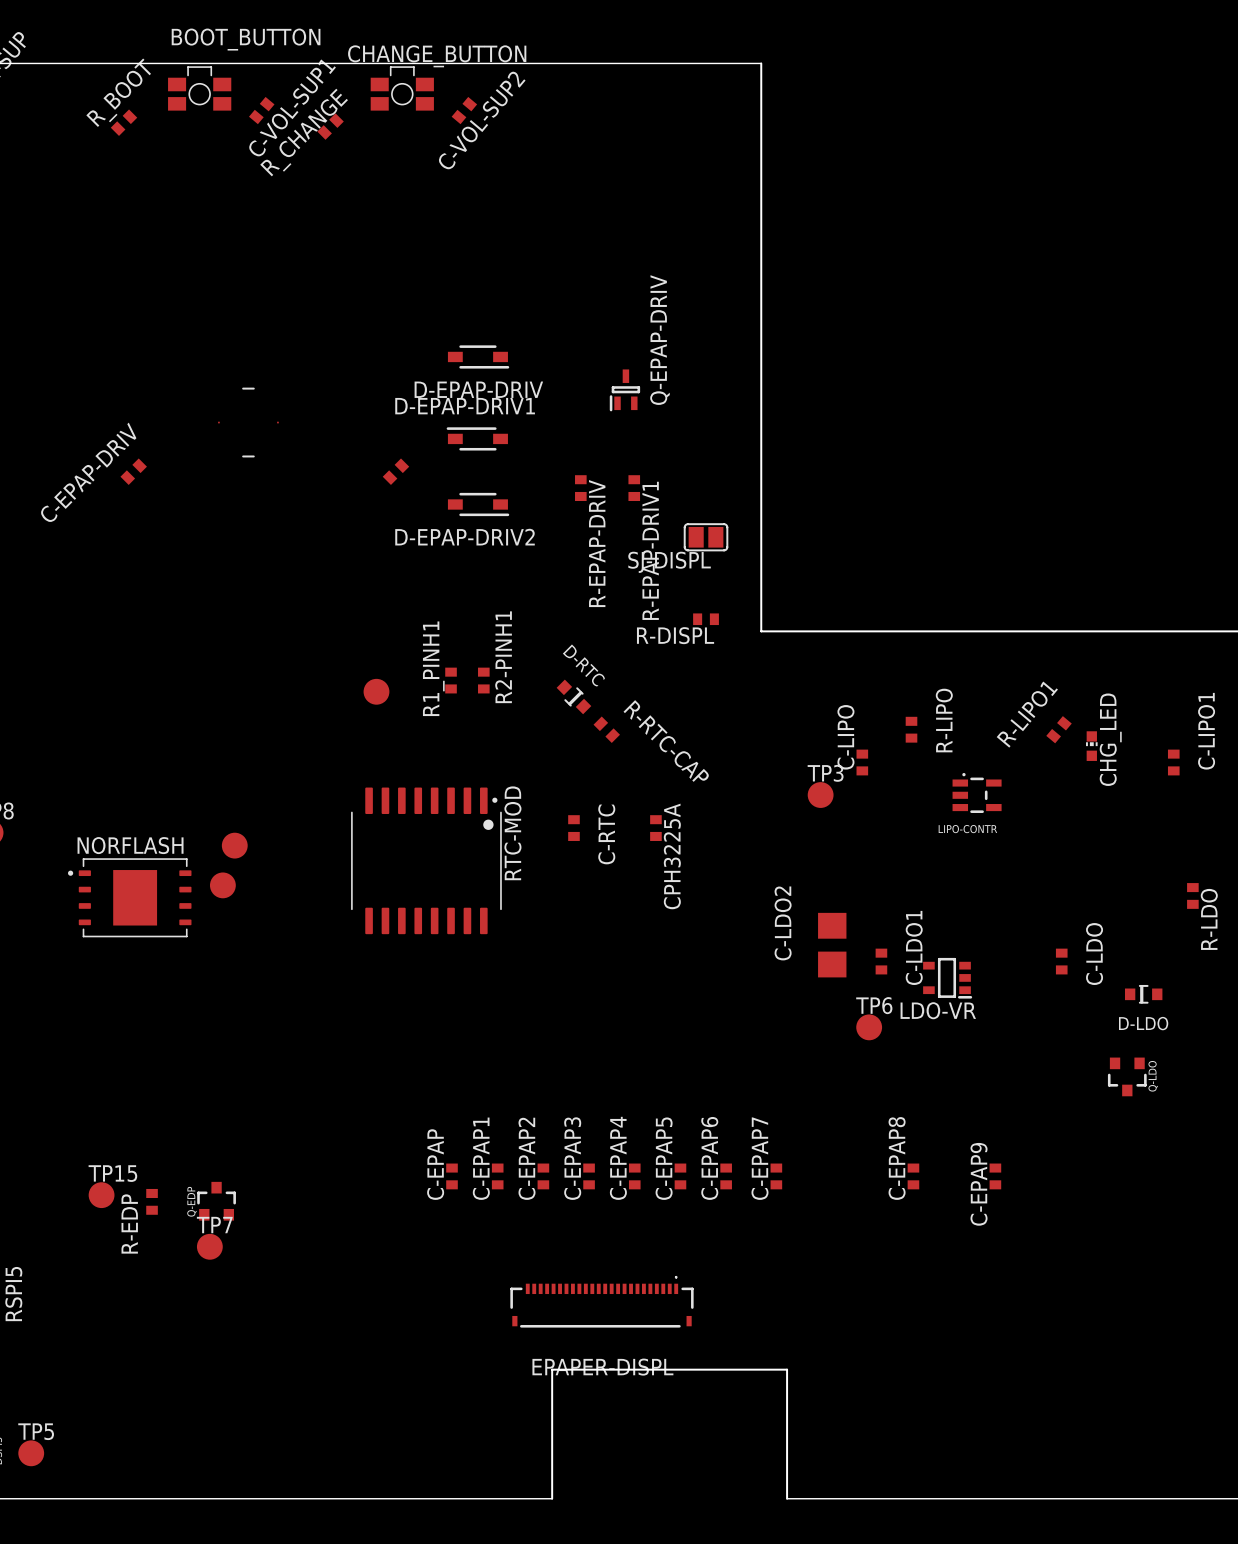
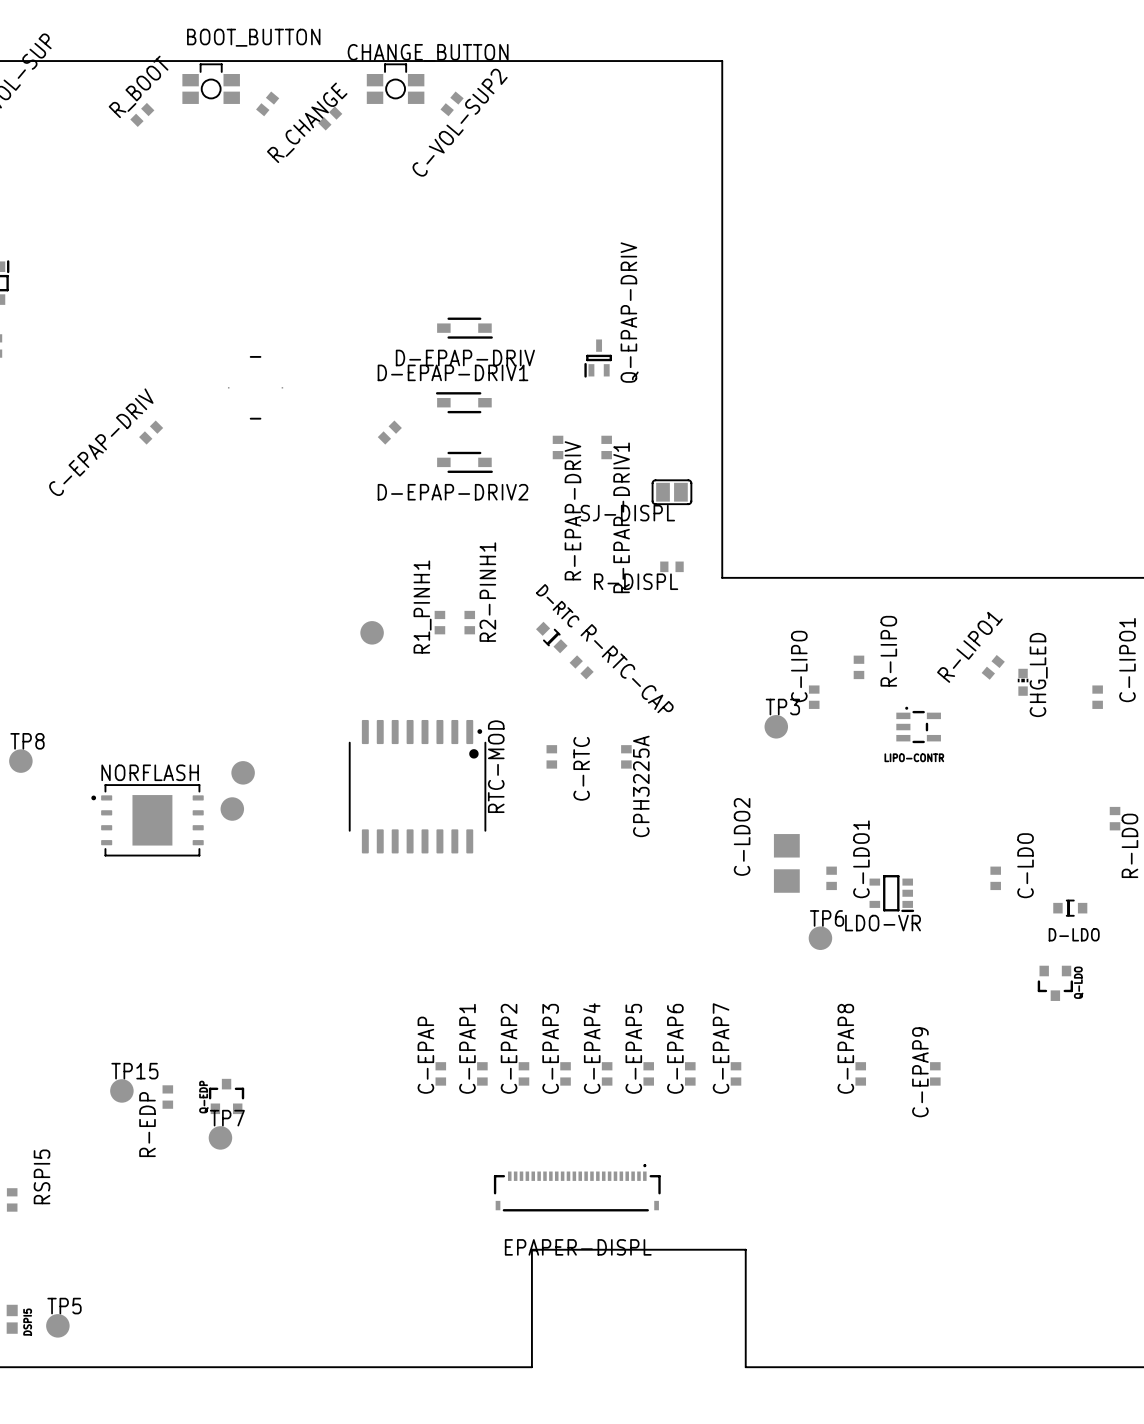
C-VOL-SUP1 name: C-VOL-SUP1 (292, 107) -> none

